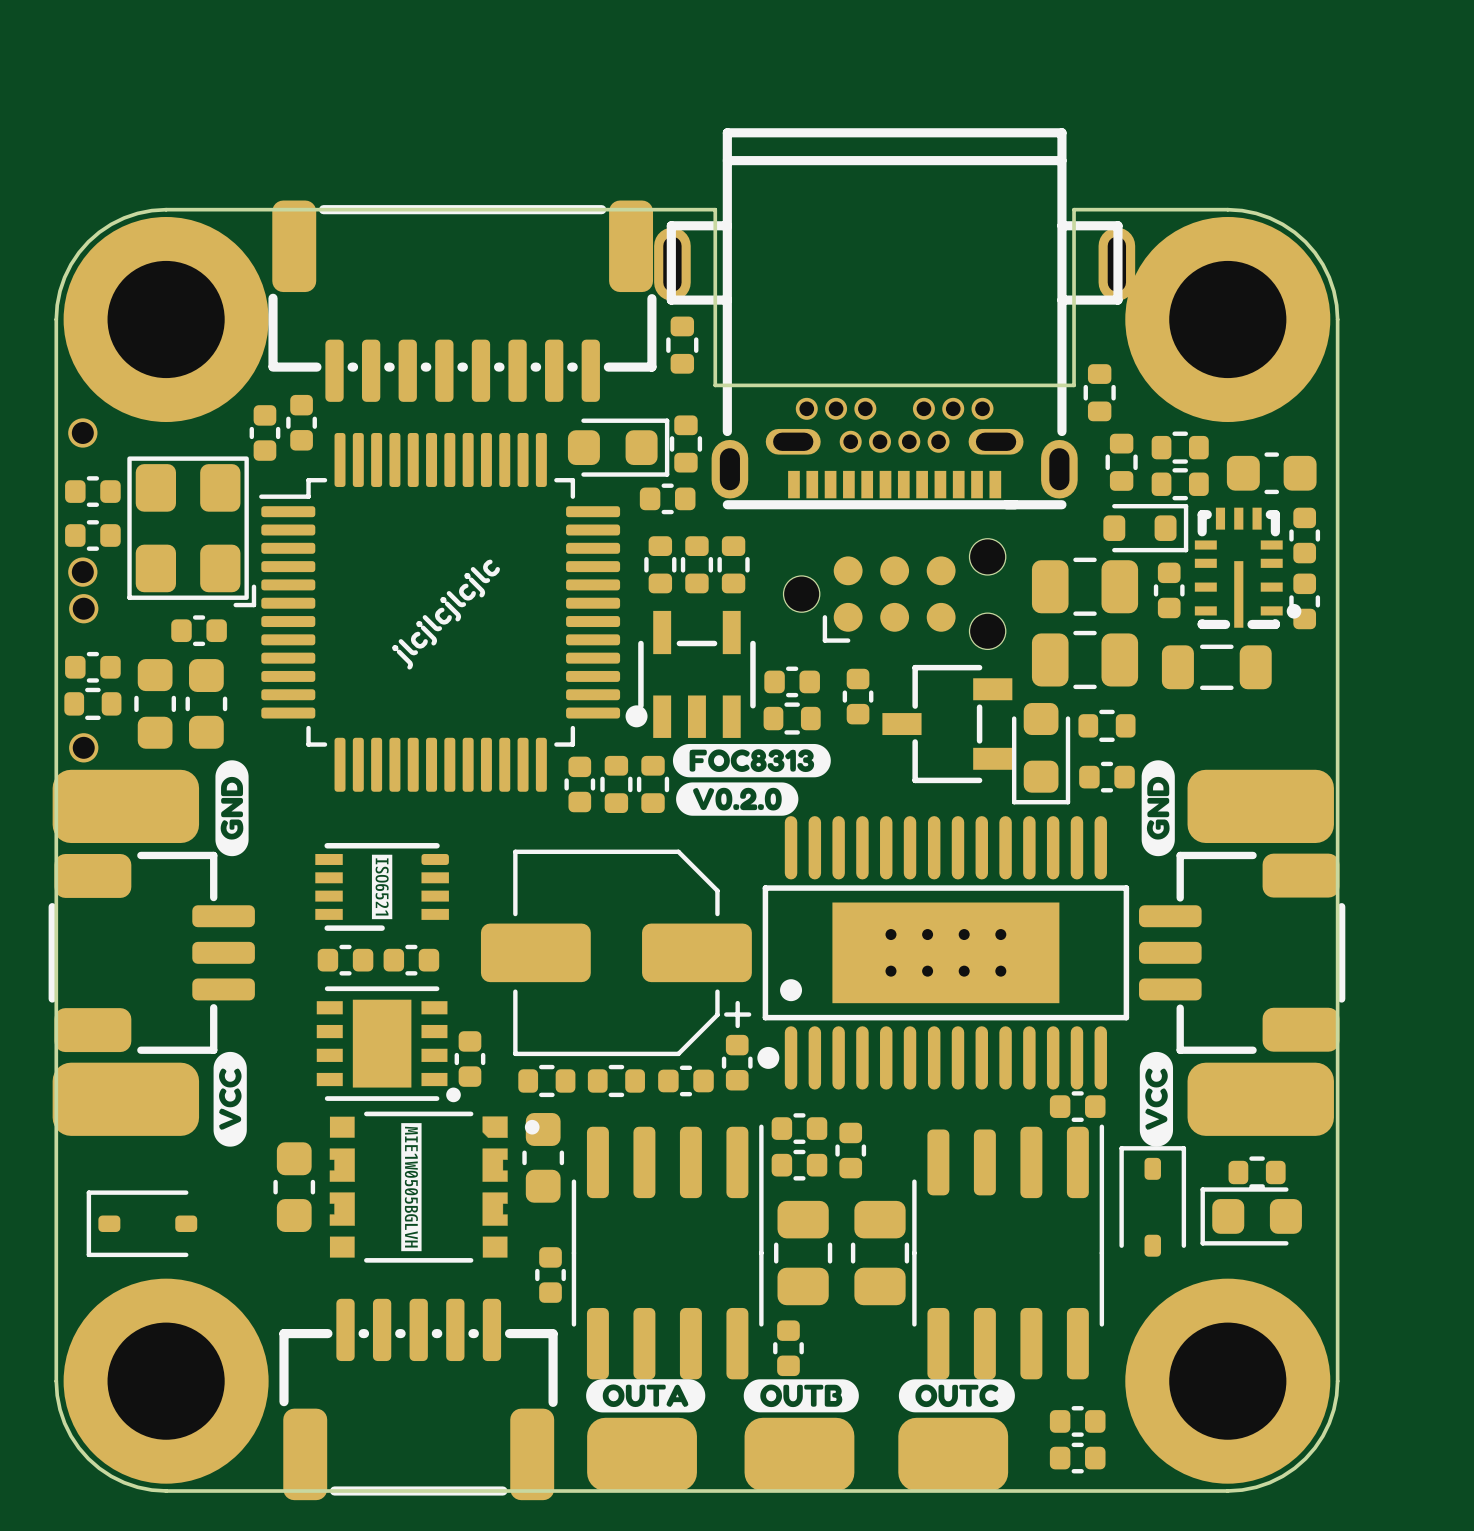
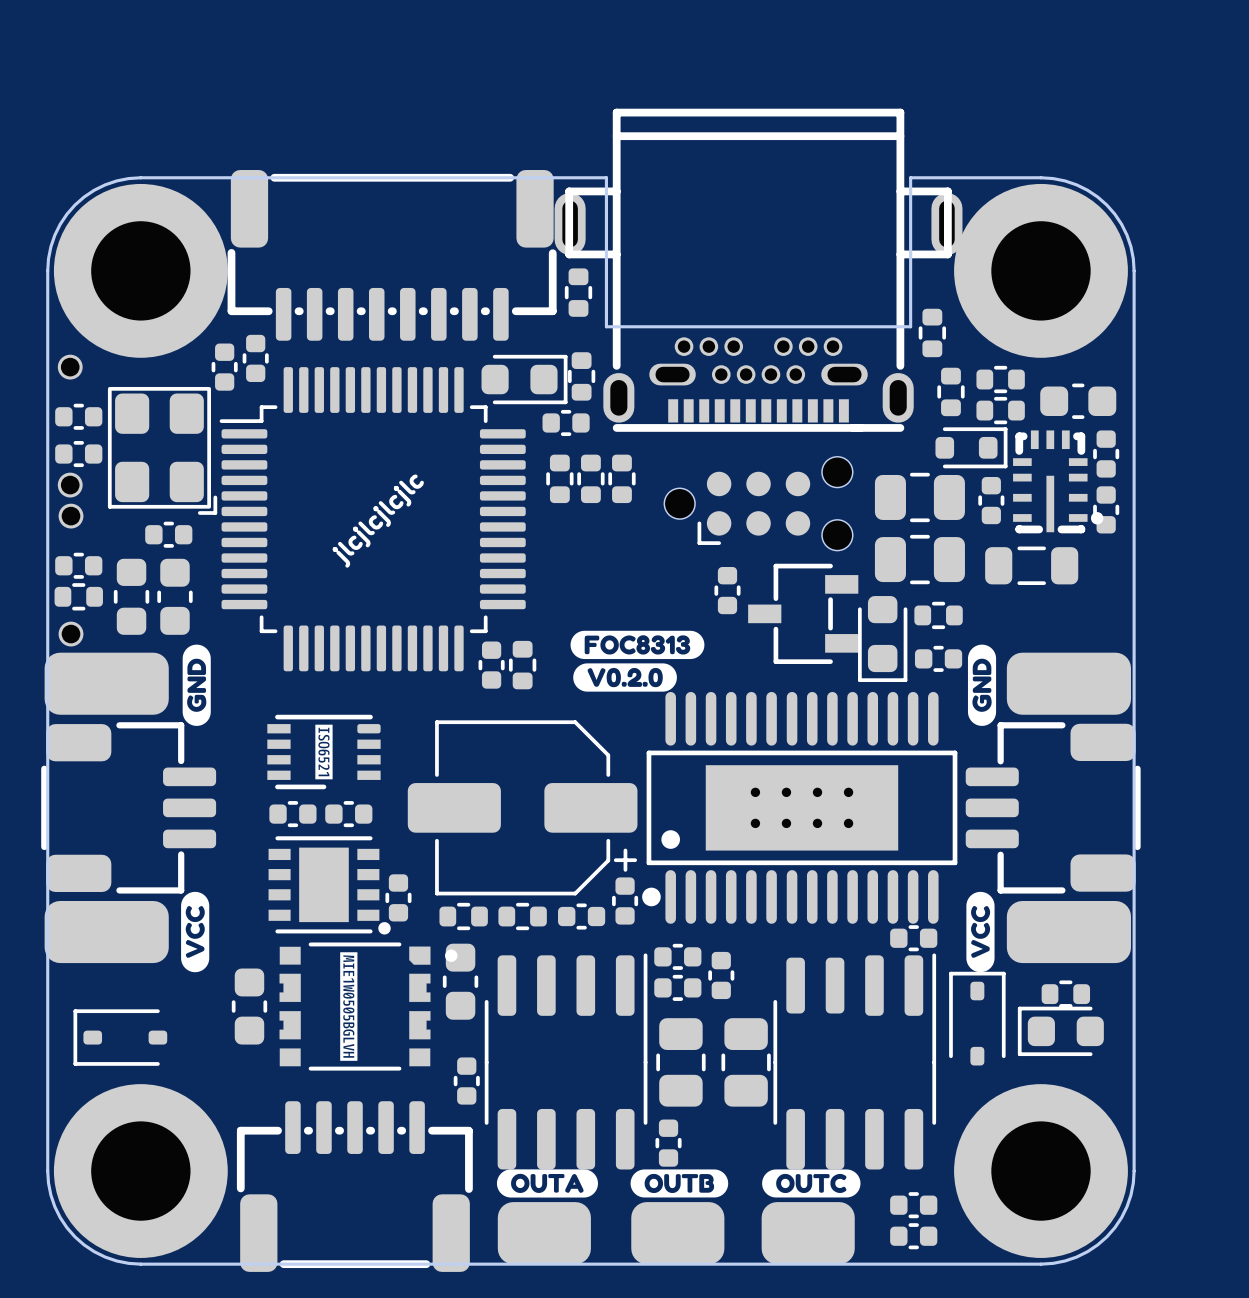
part: (690, 674) -> none
part: (792, 681) -> none
part: (792, 718) -> none
part: (653, 784) -> none

